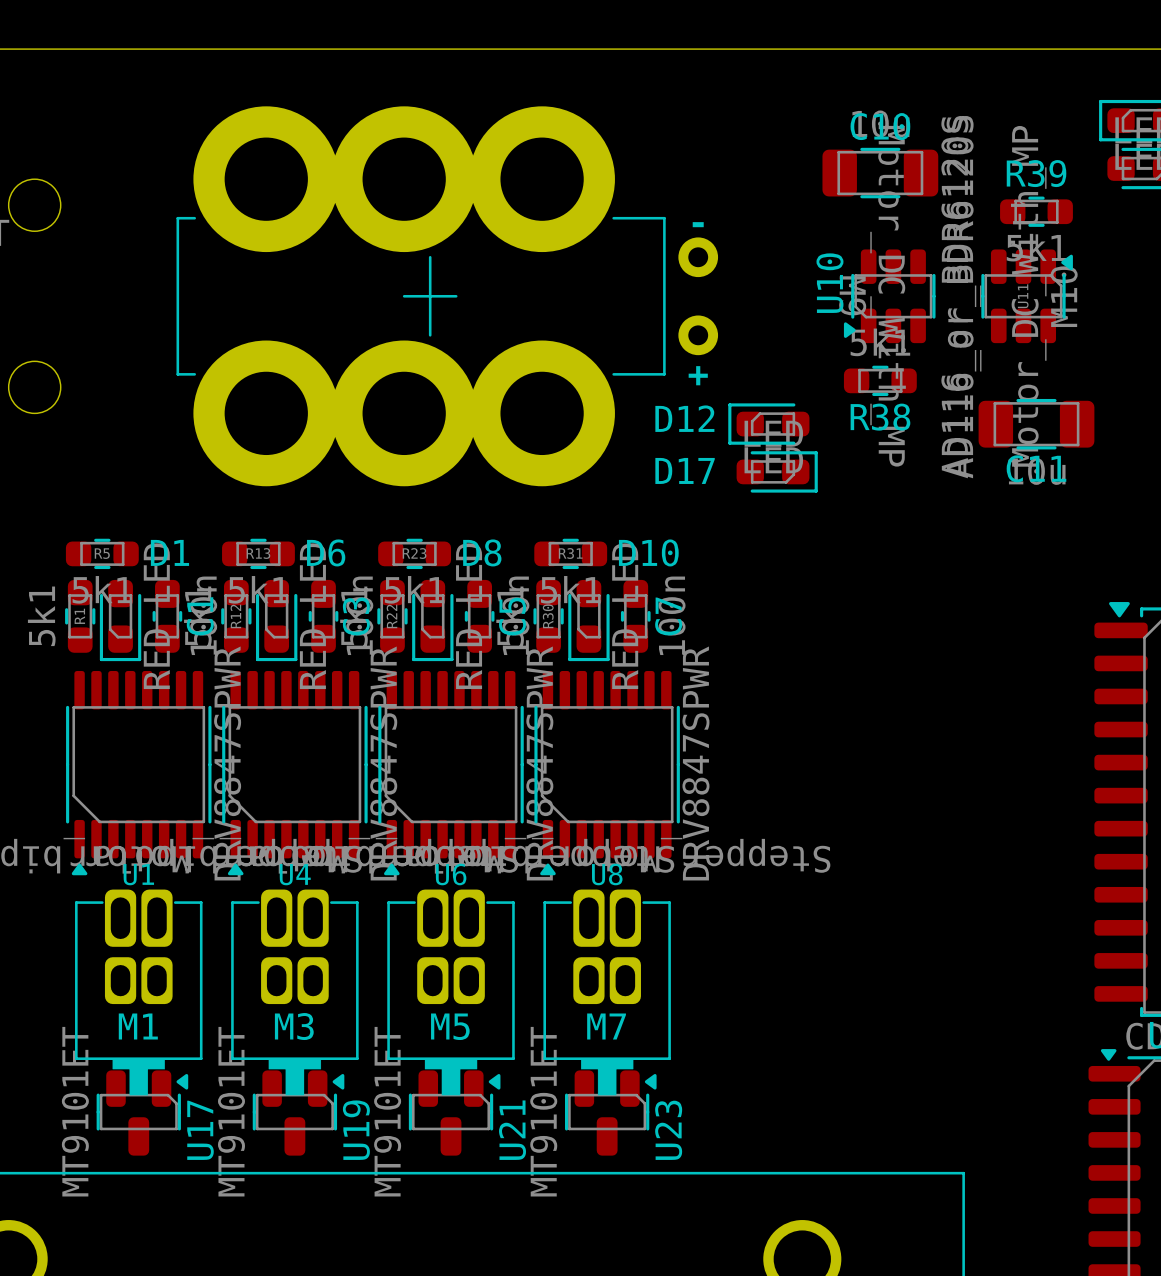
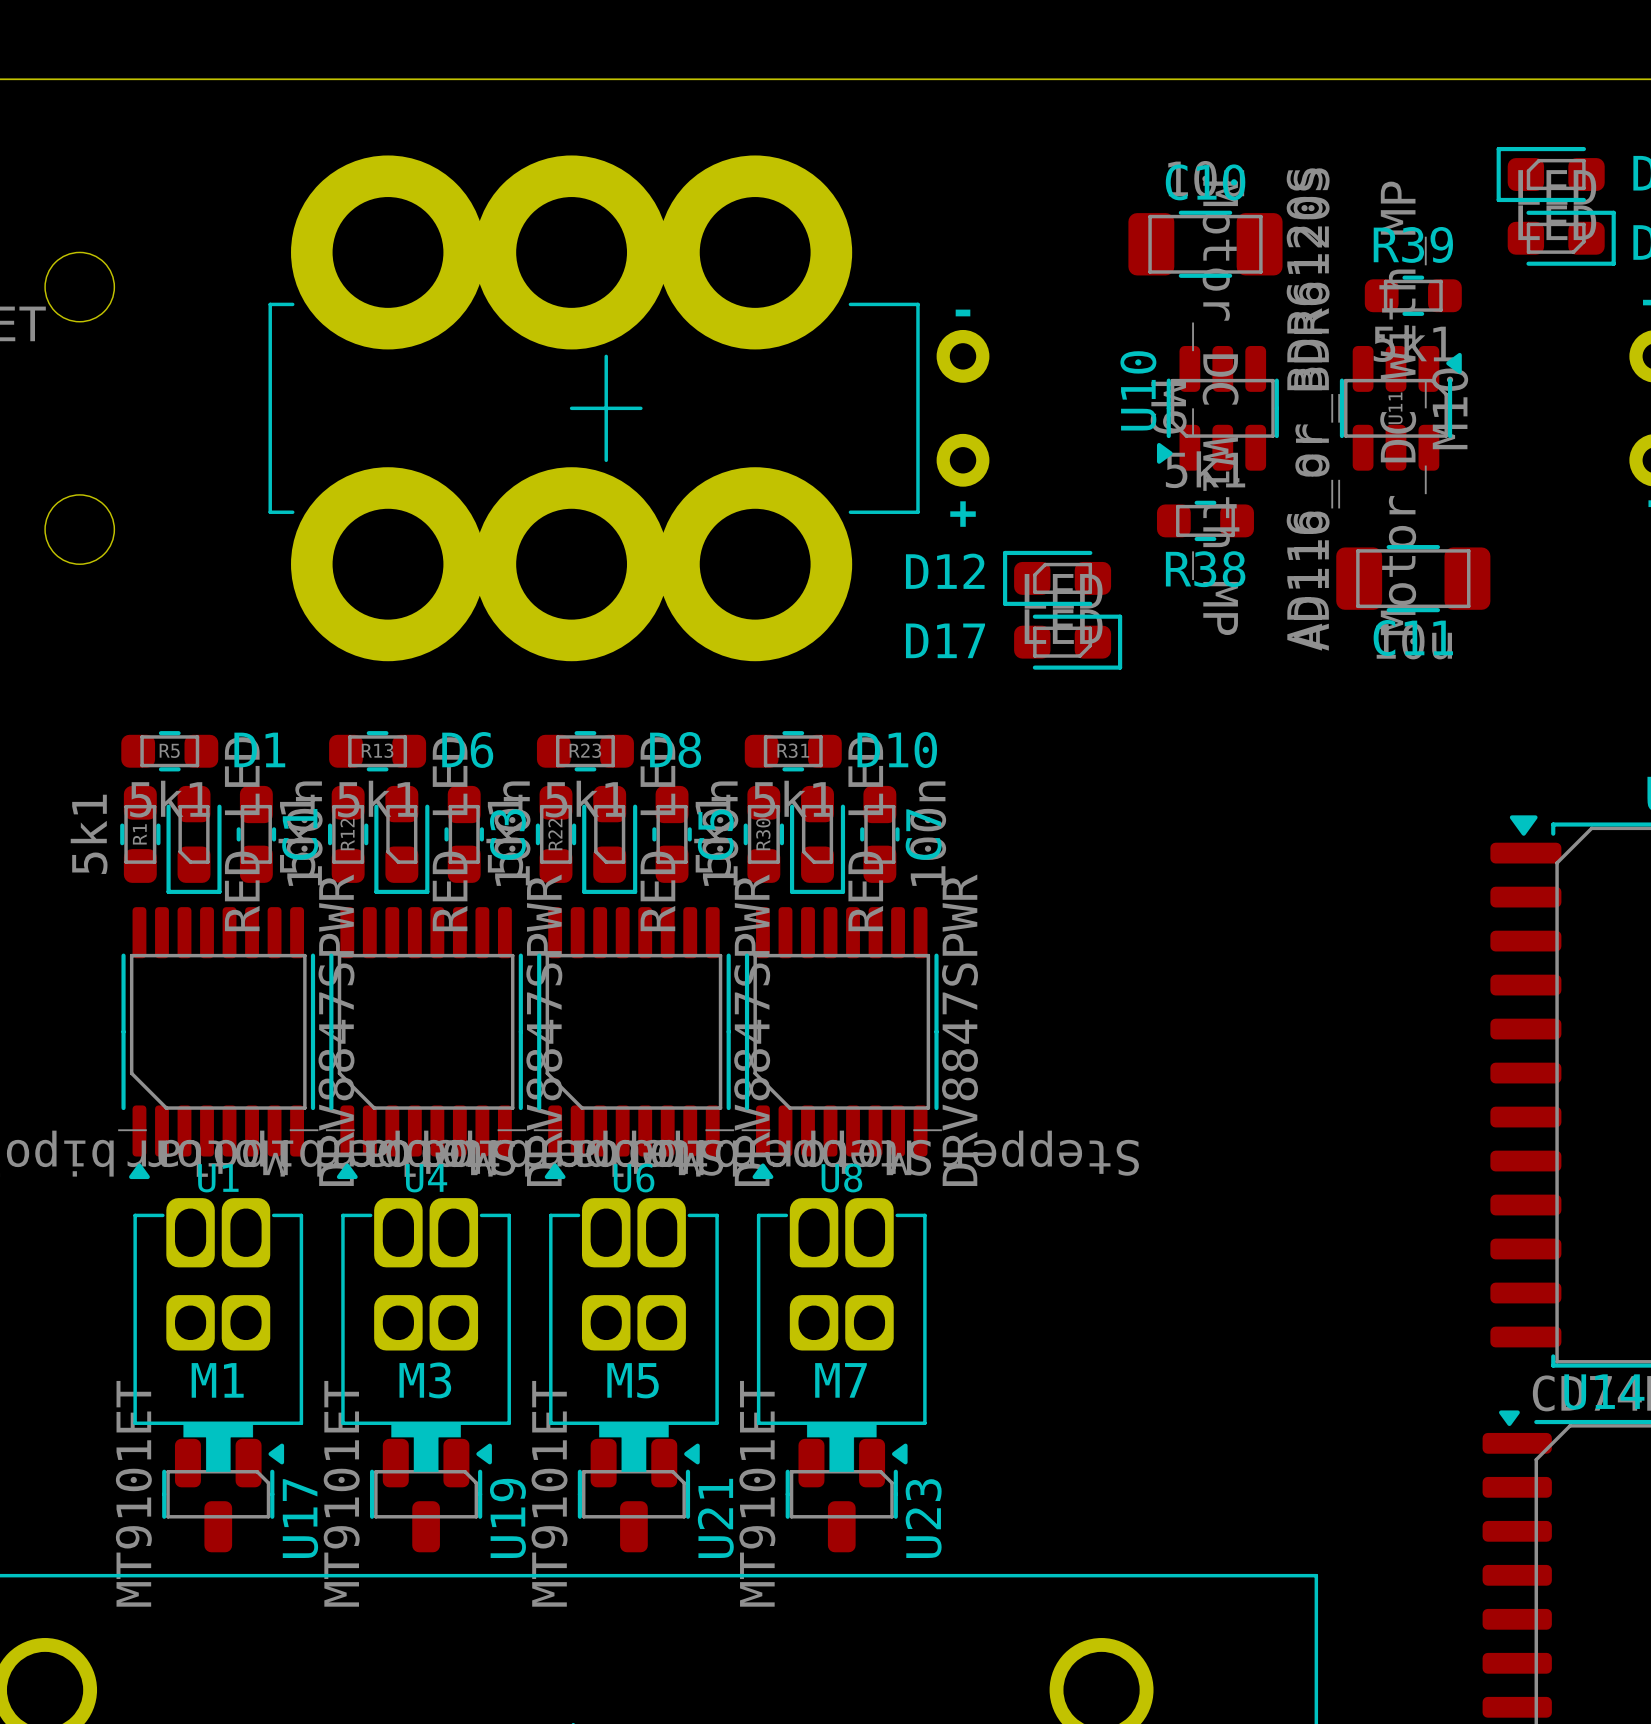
M1 footprint: [75, 889, 203, 1096] -> [133, 1198, 304, 1472]
M3 footprint: [231, 889, 359, 1096] -> [341, 1198, 511, 1472]
M5 footprint: [387, 889, 515, 1096] -> [549, 1198, 719, 1472]
M7 footprint: [543, 889, 671, 1096] -> [756, 1198, 927, 1472]

